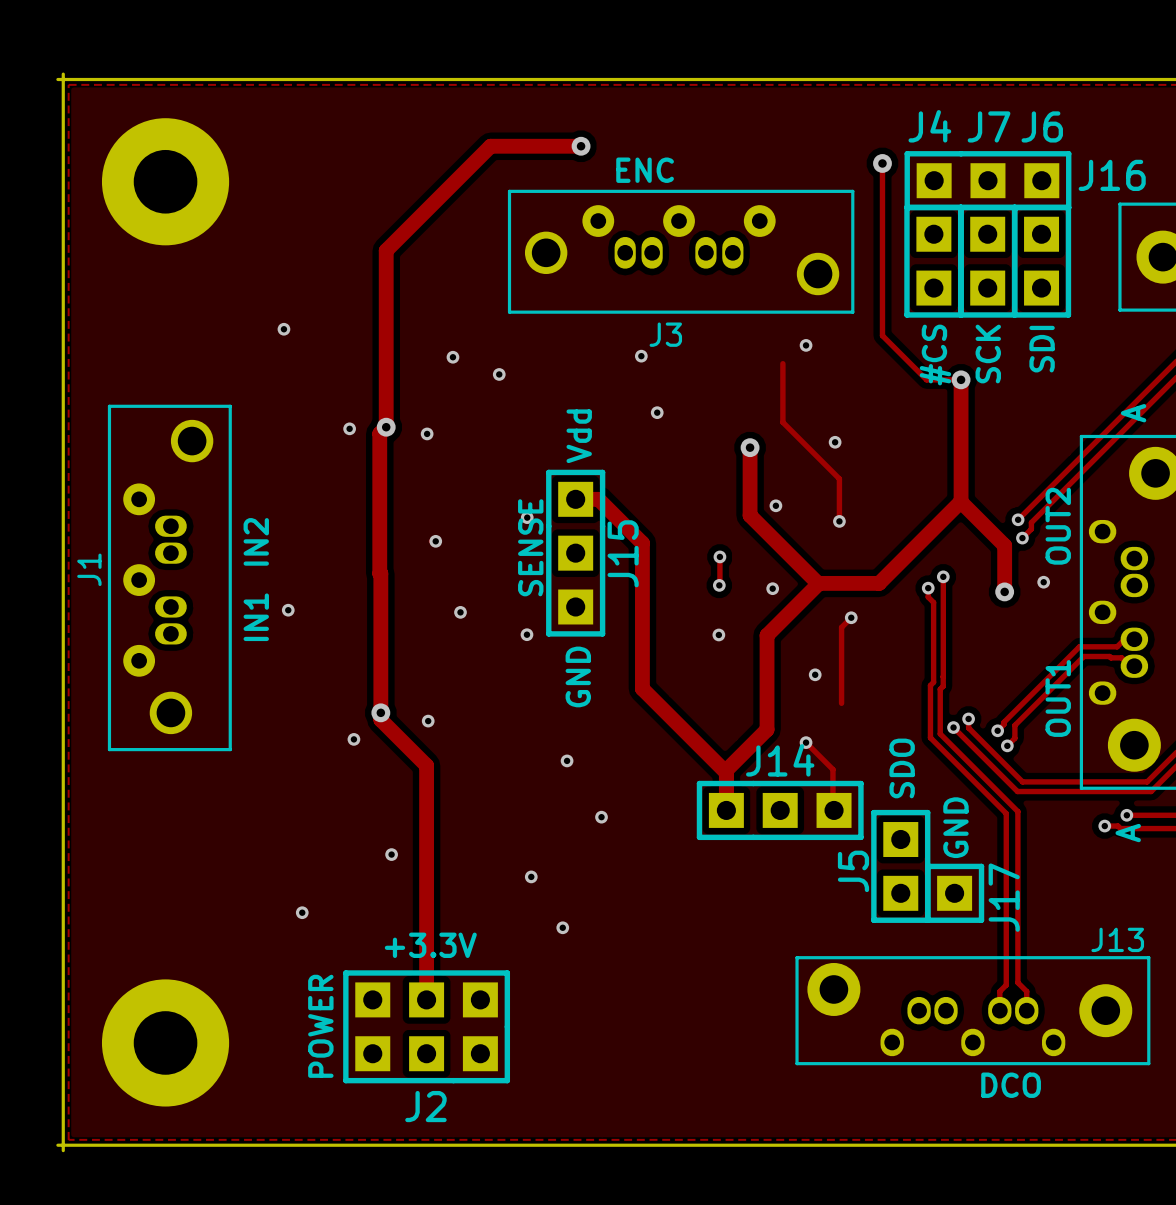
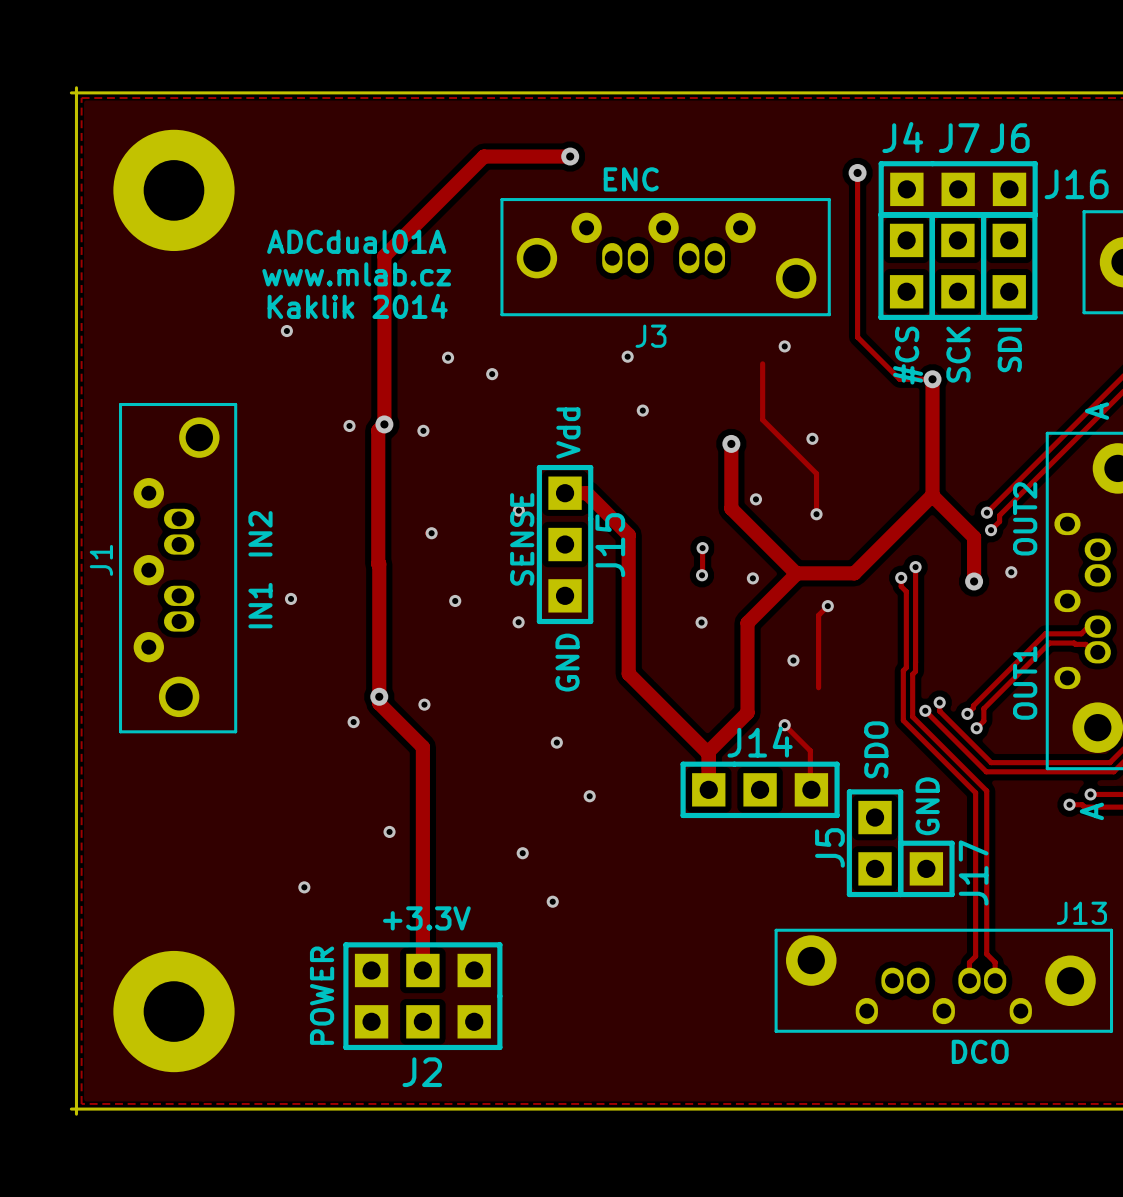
text: none -> ADCdual01A (356, 241)
text: none -> www.mlab.cz (356, 274)
text: none -> Kaklik 2014 (357, 306)

